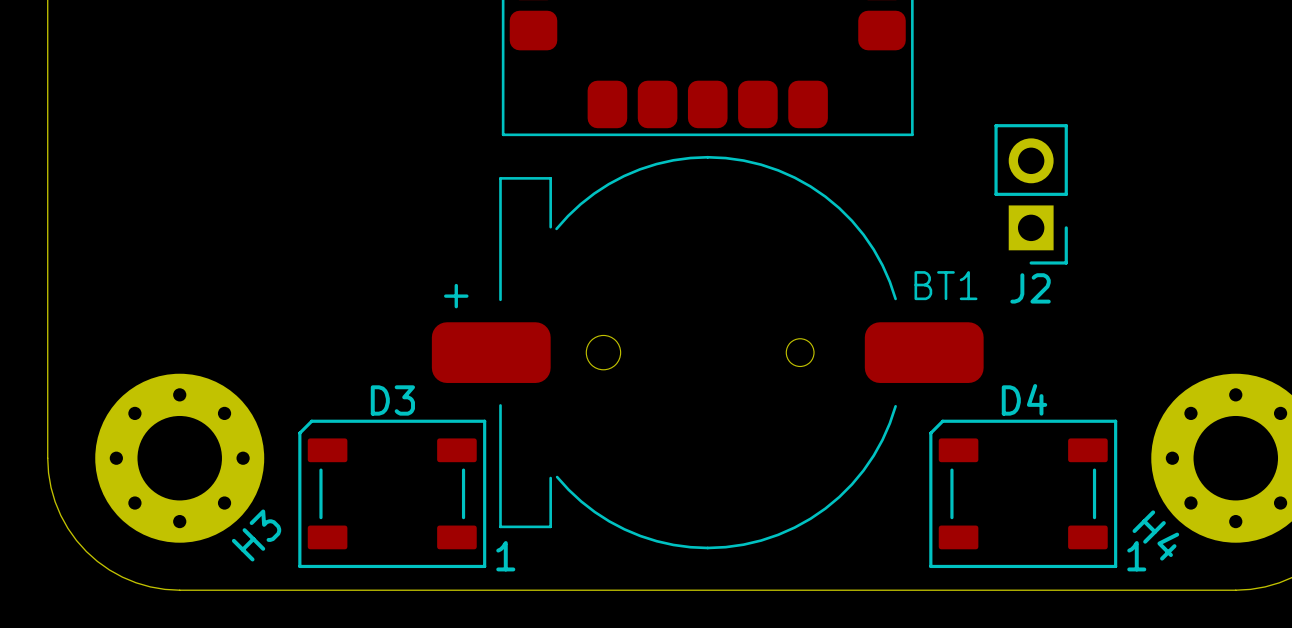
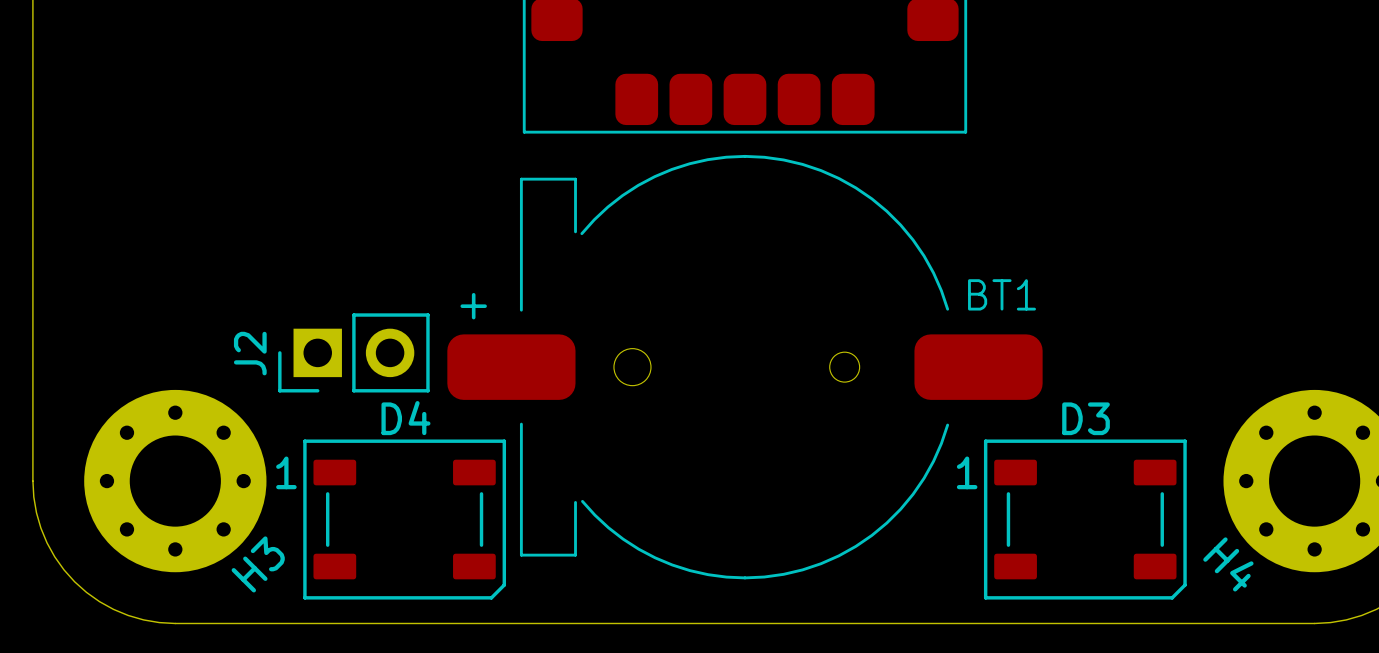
J2 rotation: 0° (1031, 194) -> 90° clockwise (353, 352)
J2 position: (1031, 194) -> (353, 352)
D3 footprint: [298, 419, 487, 569] -> [983, 439, 1187, 600]
D4 footprint: [929, 419, 1118, 569] -> [303, 439, 507, 600]

